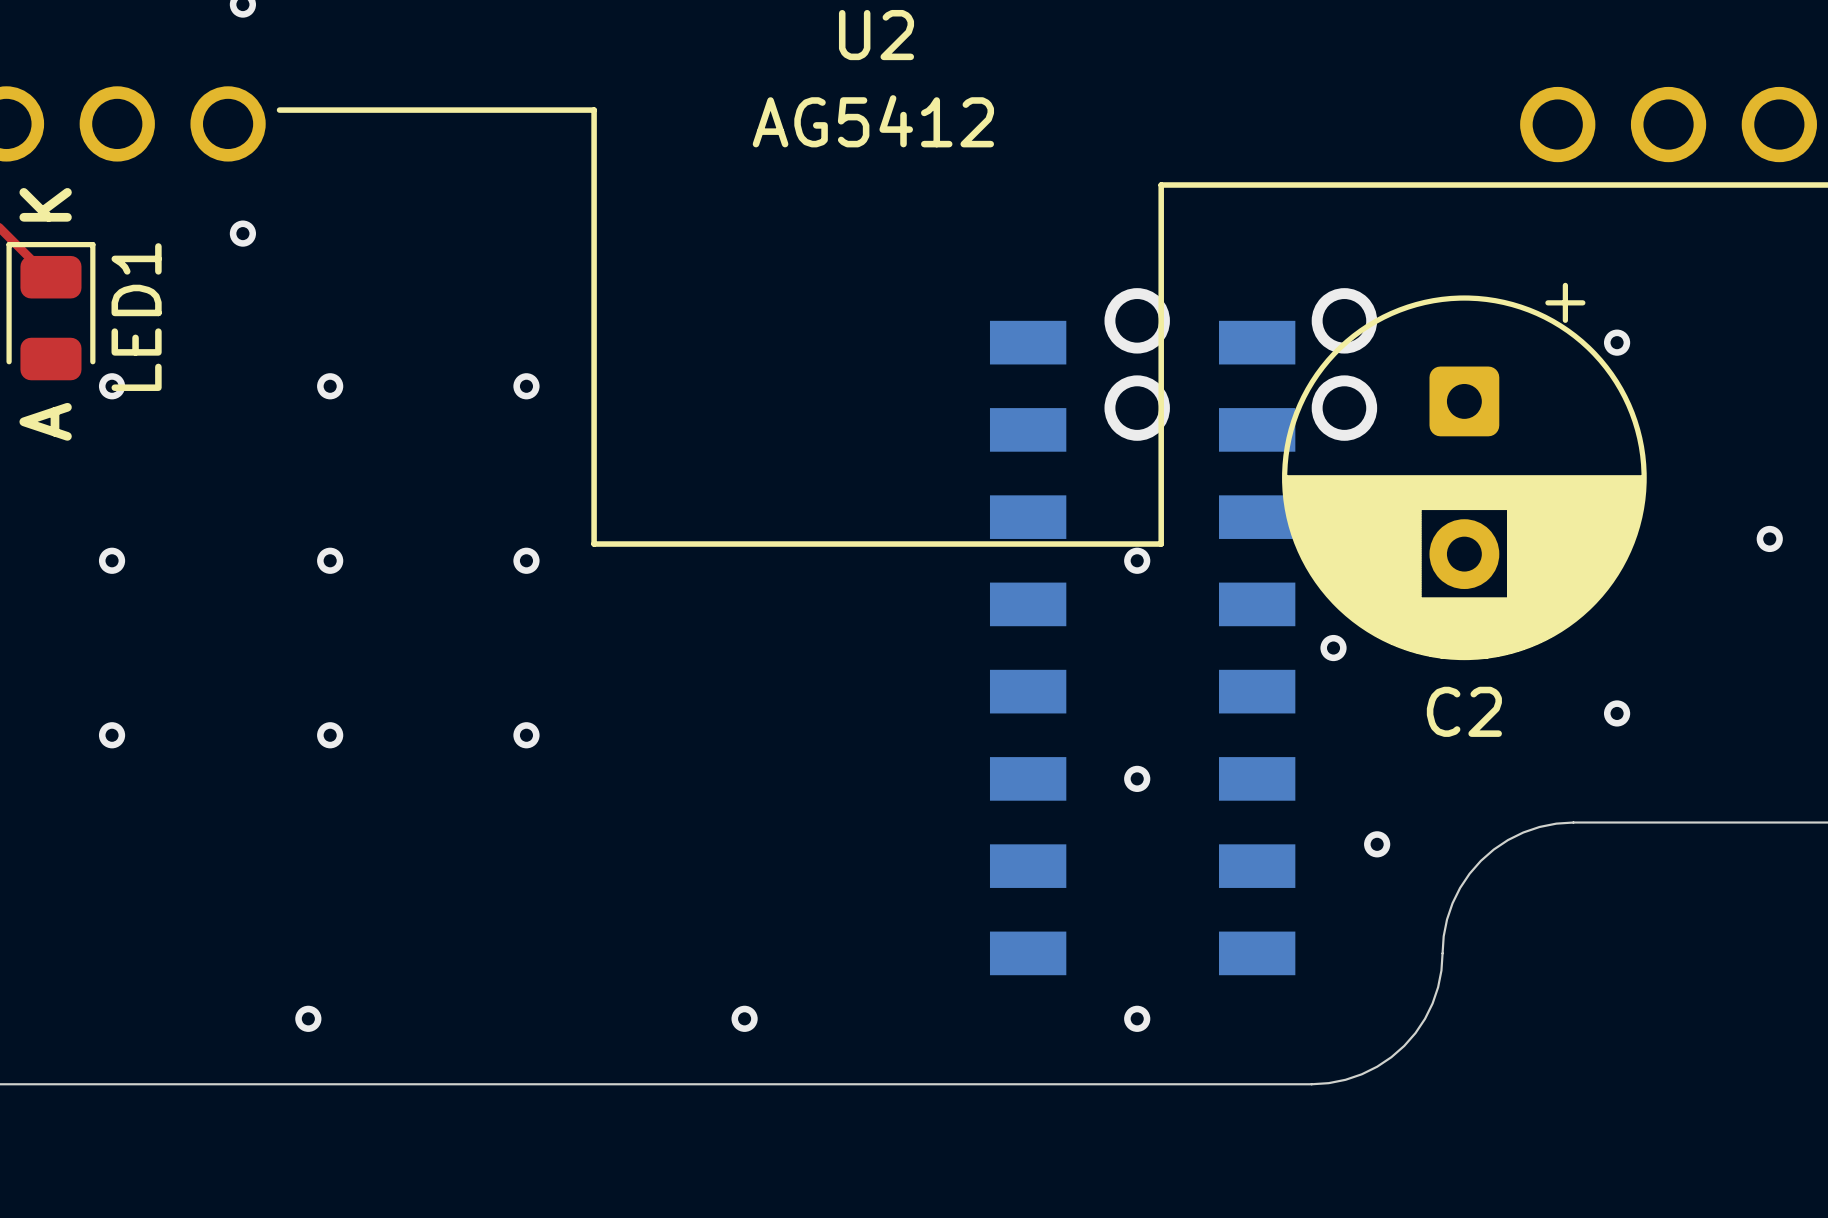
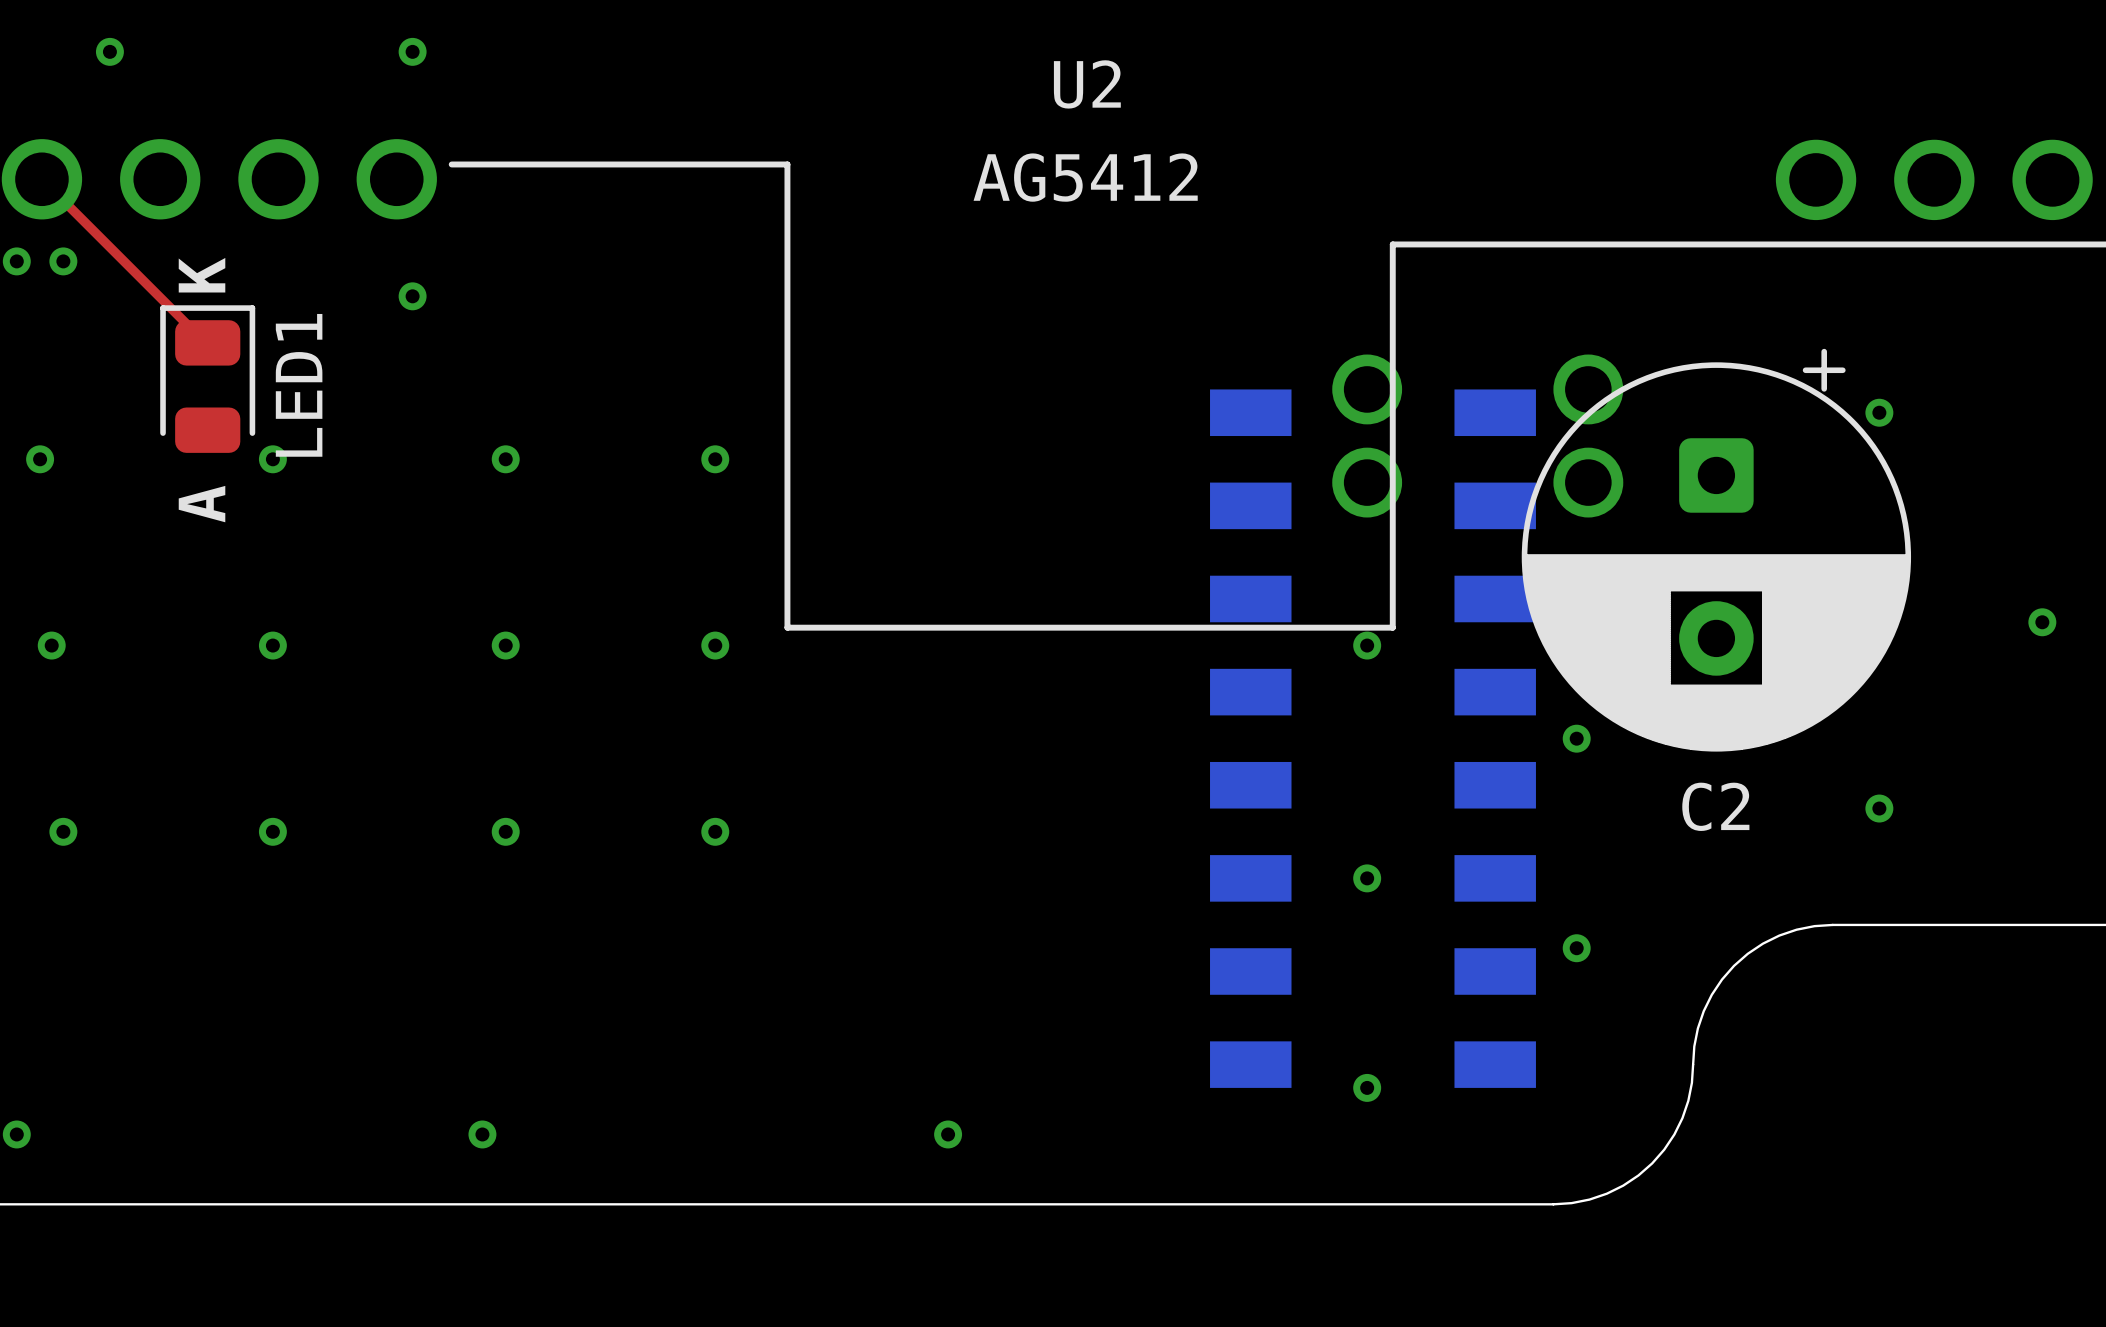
via position: (1377, 844) -> (1576, 948)
via position: (1137, 1018) -> (1367, 1087)

